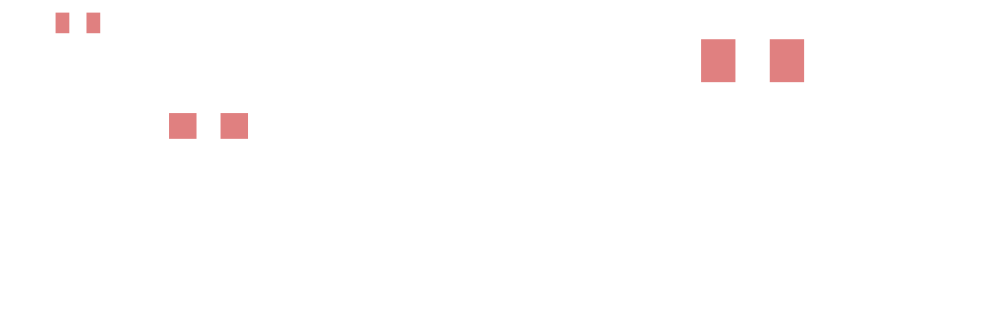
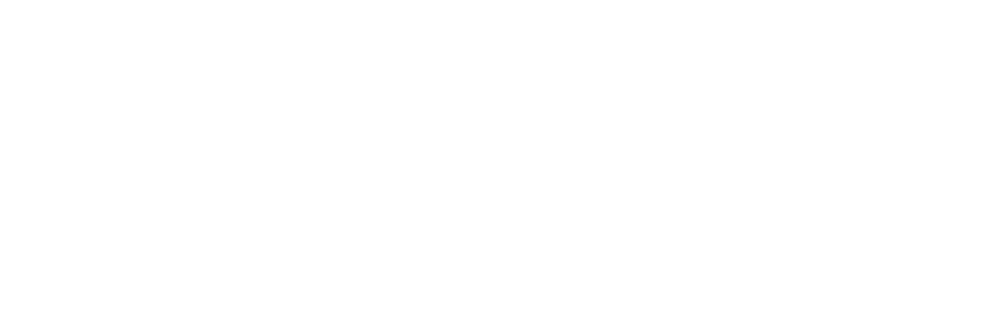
part: (77, 22) -> none
part: (752, 60) -> none
part: (208, 125) -> none

